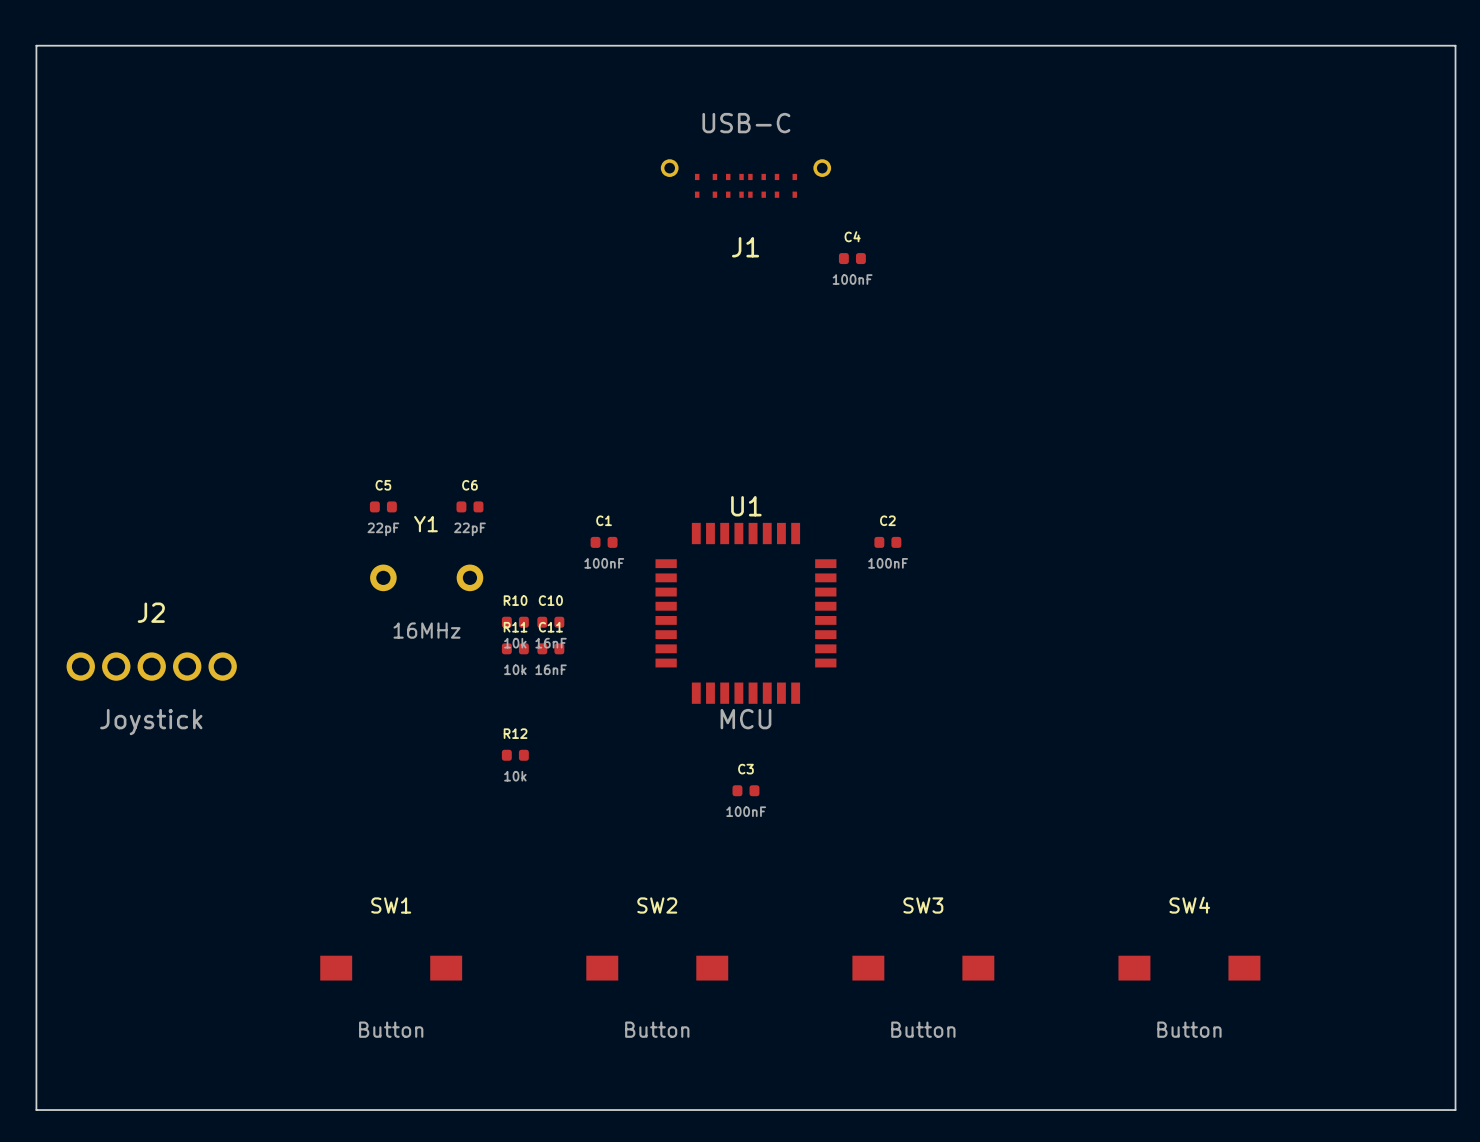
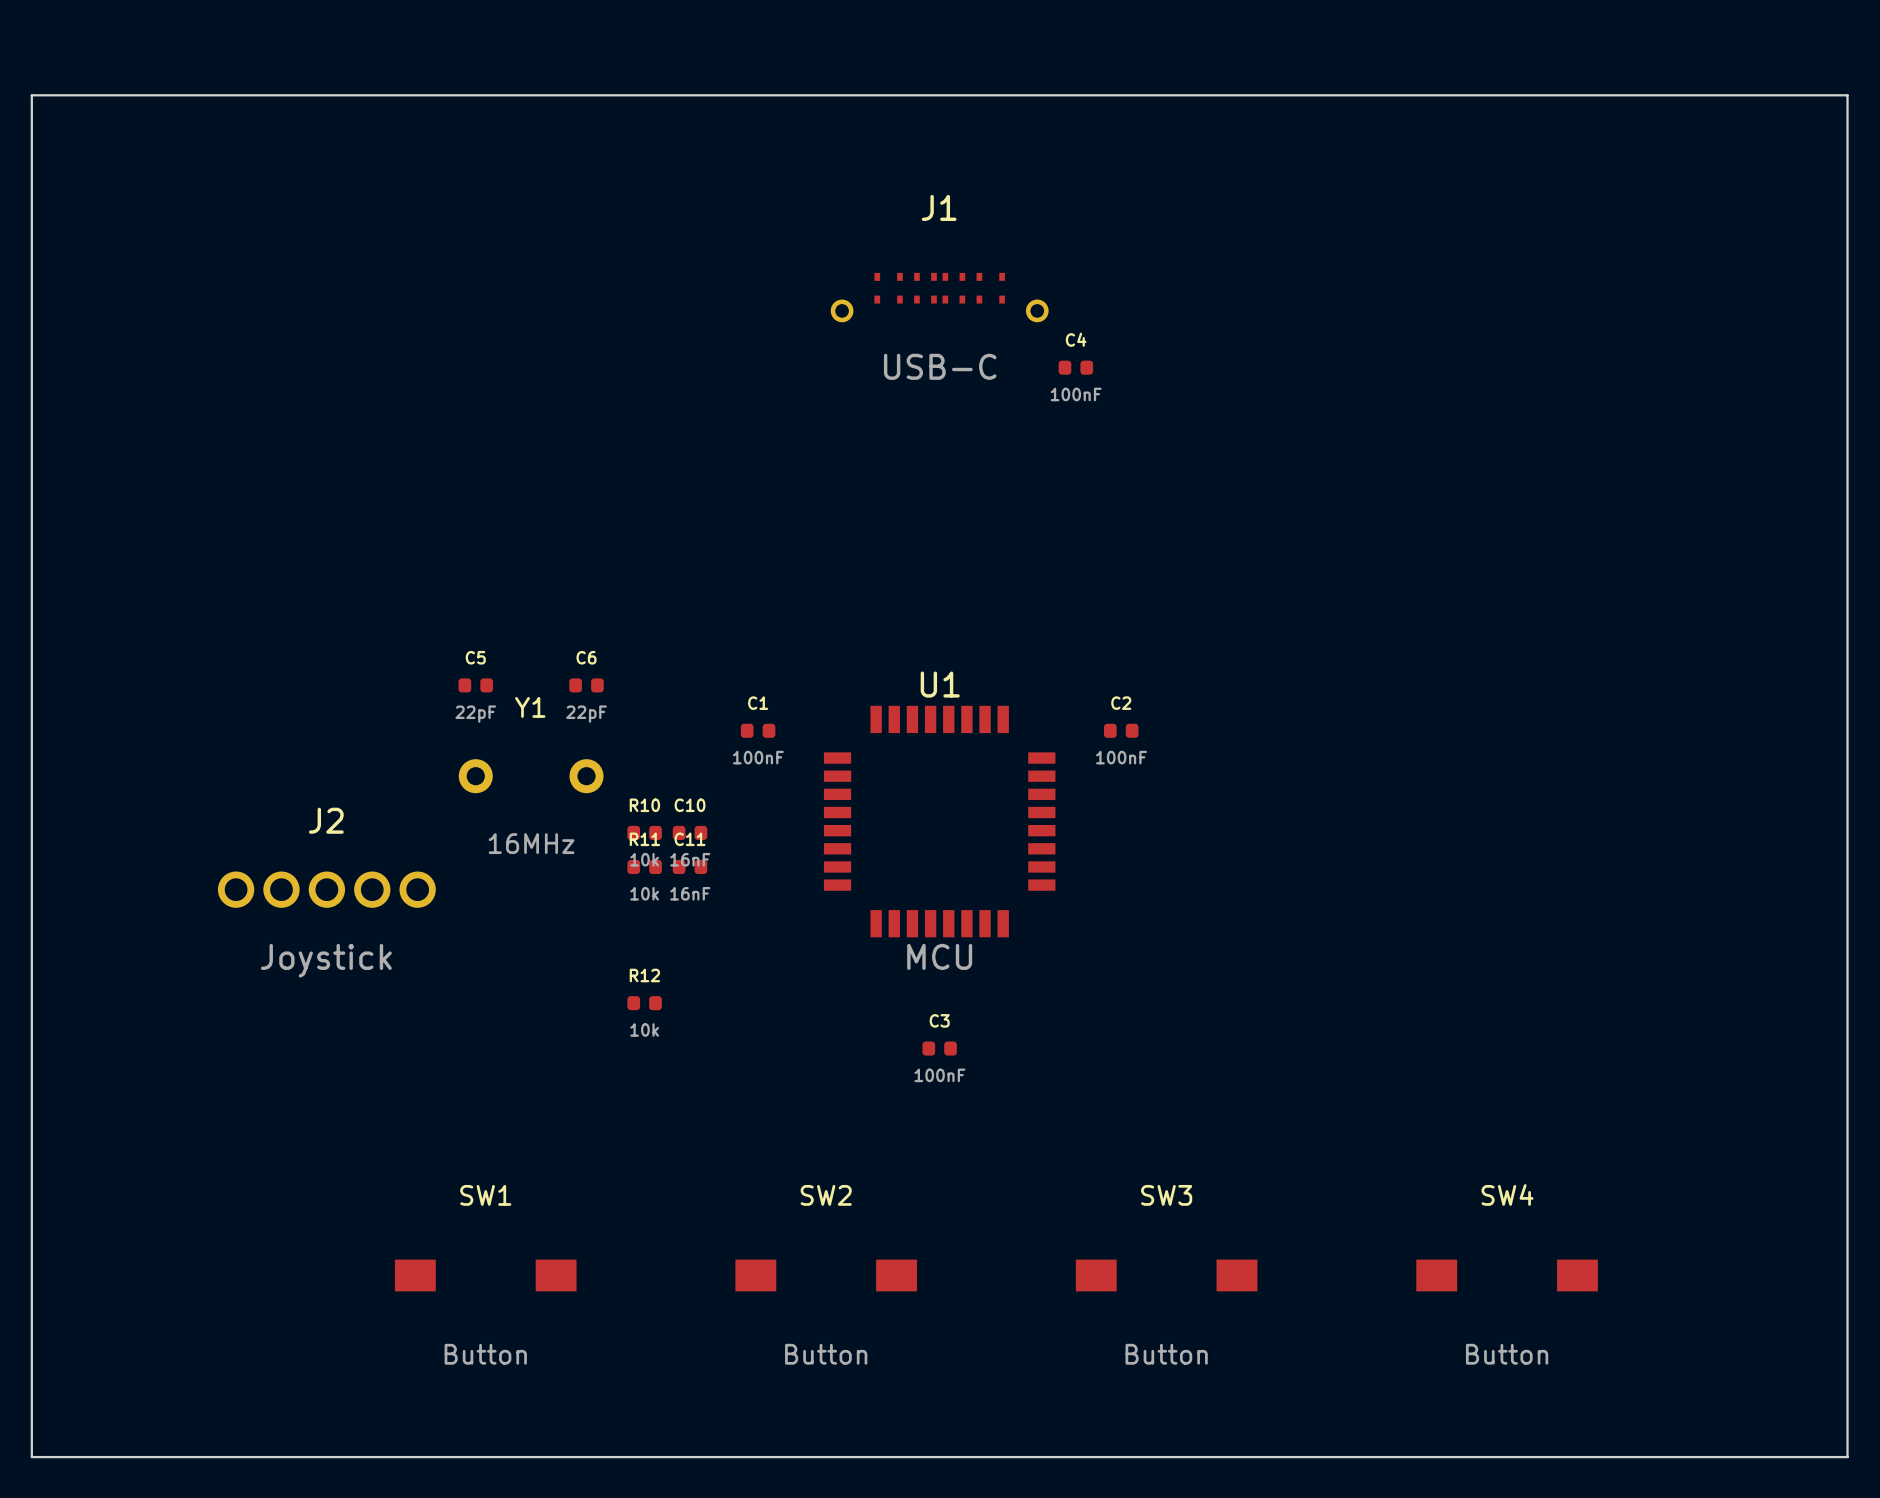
J1 rotation: 0° (745, 178) -> 180° (939, 297)
J2 position: (151, 666) -> (326, 889)

